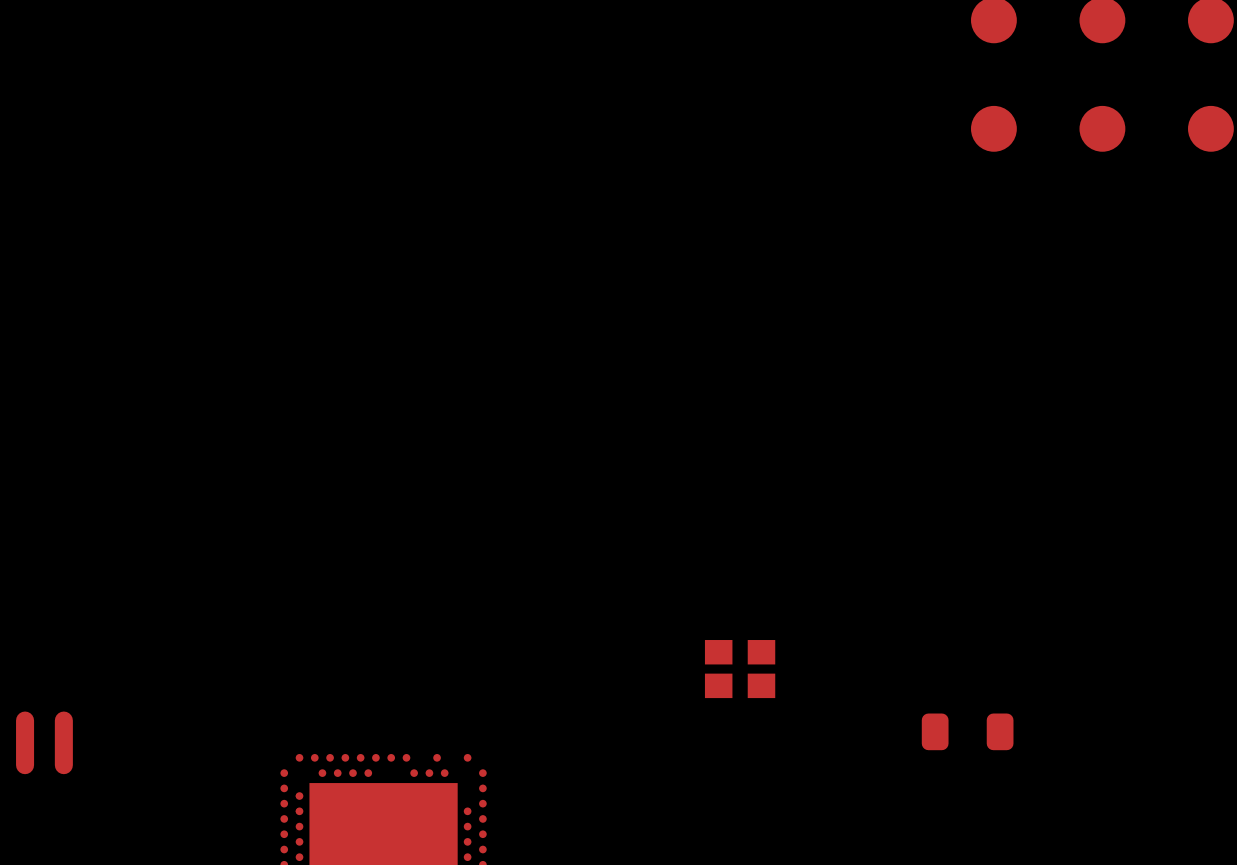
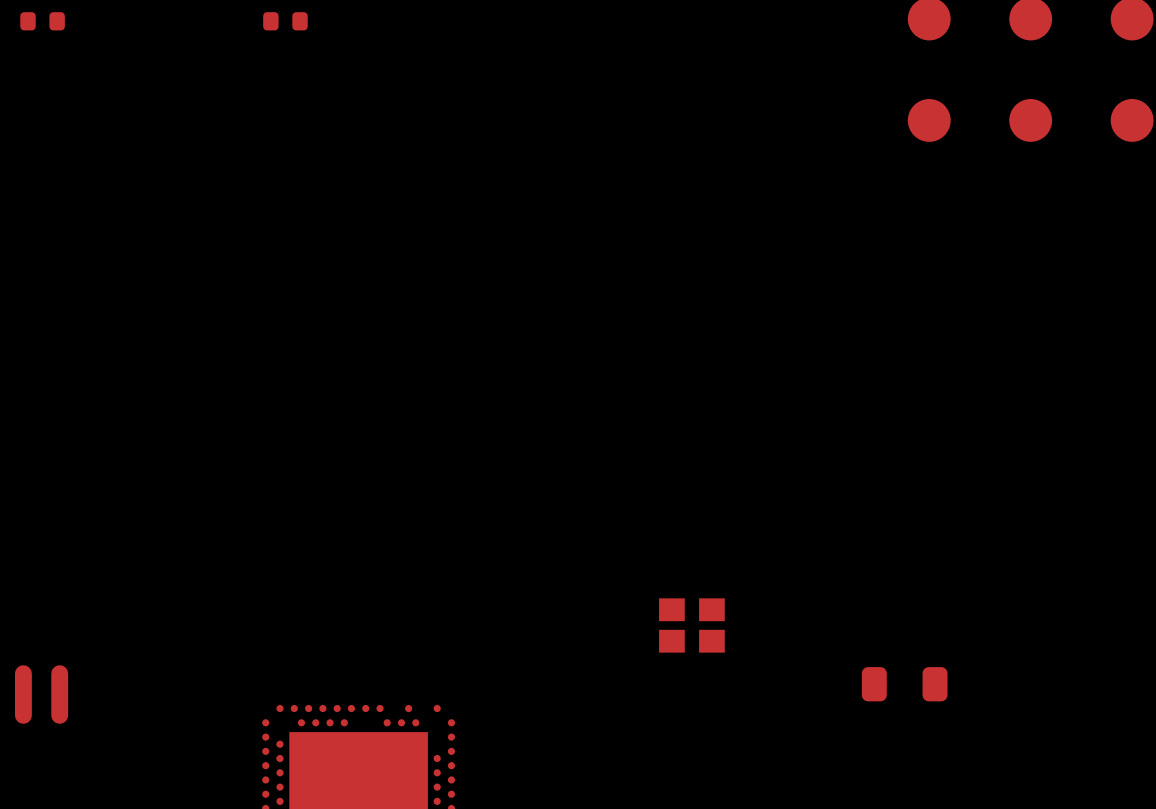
part: none -> (42, 21)
part: none -> (285, 21)

